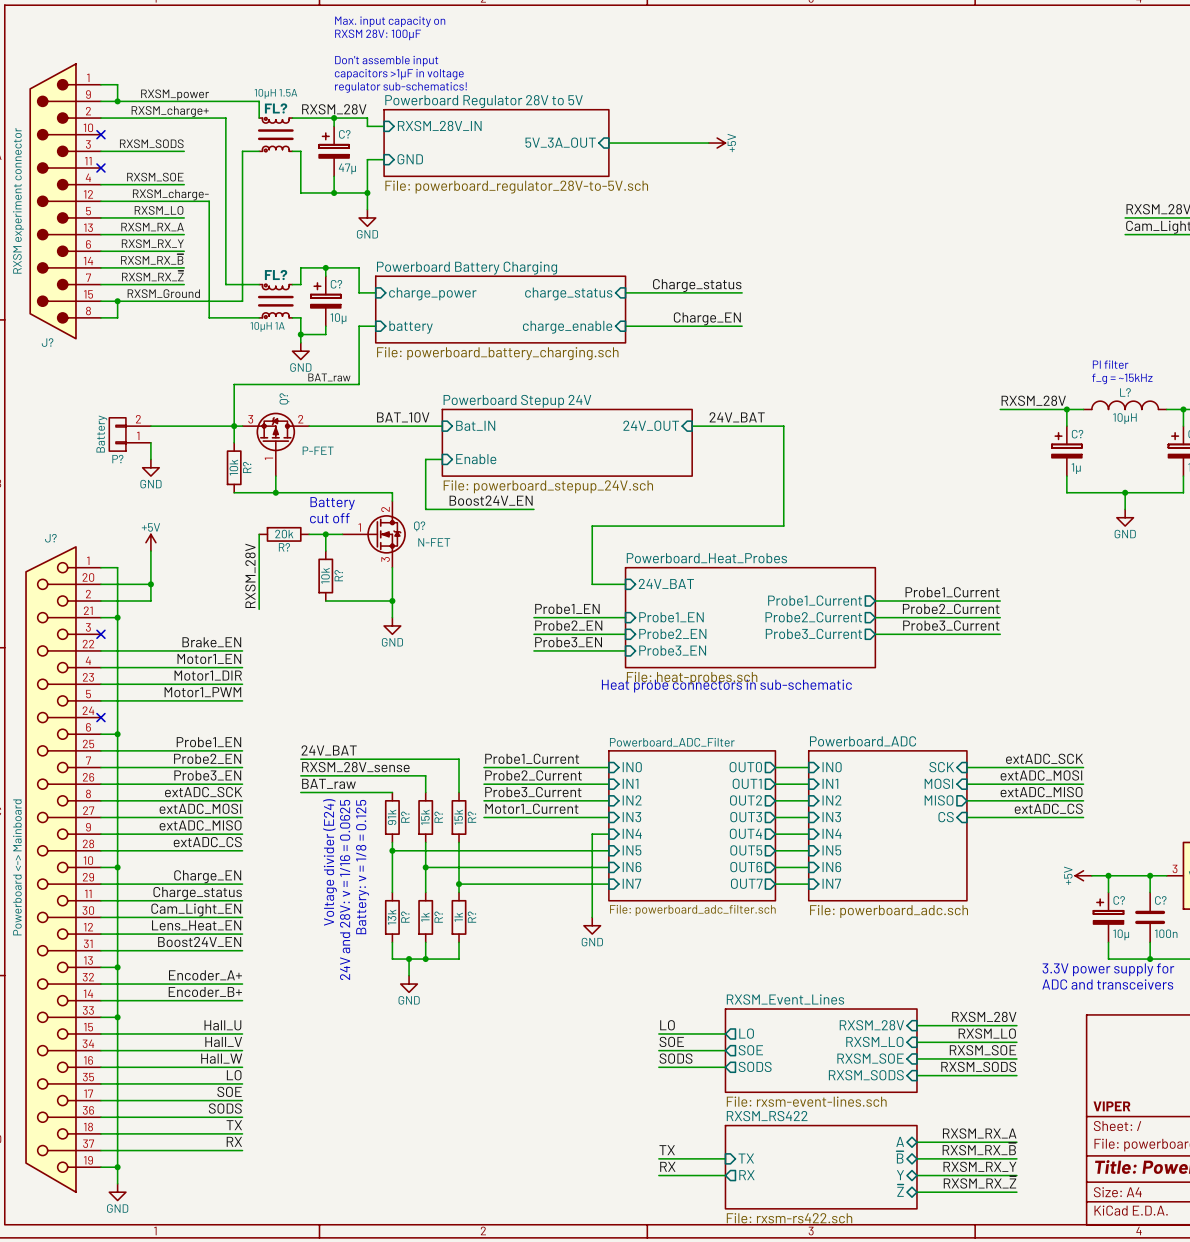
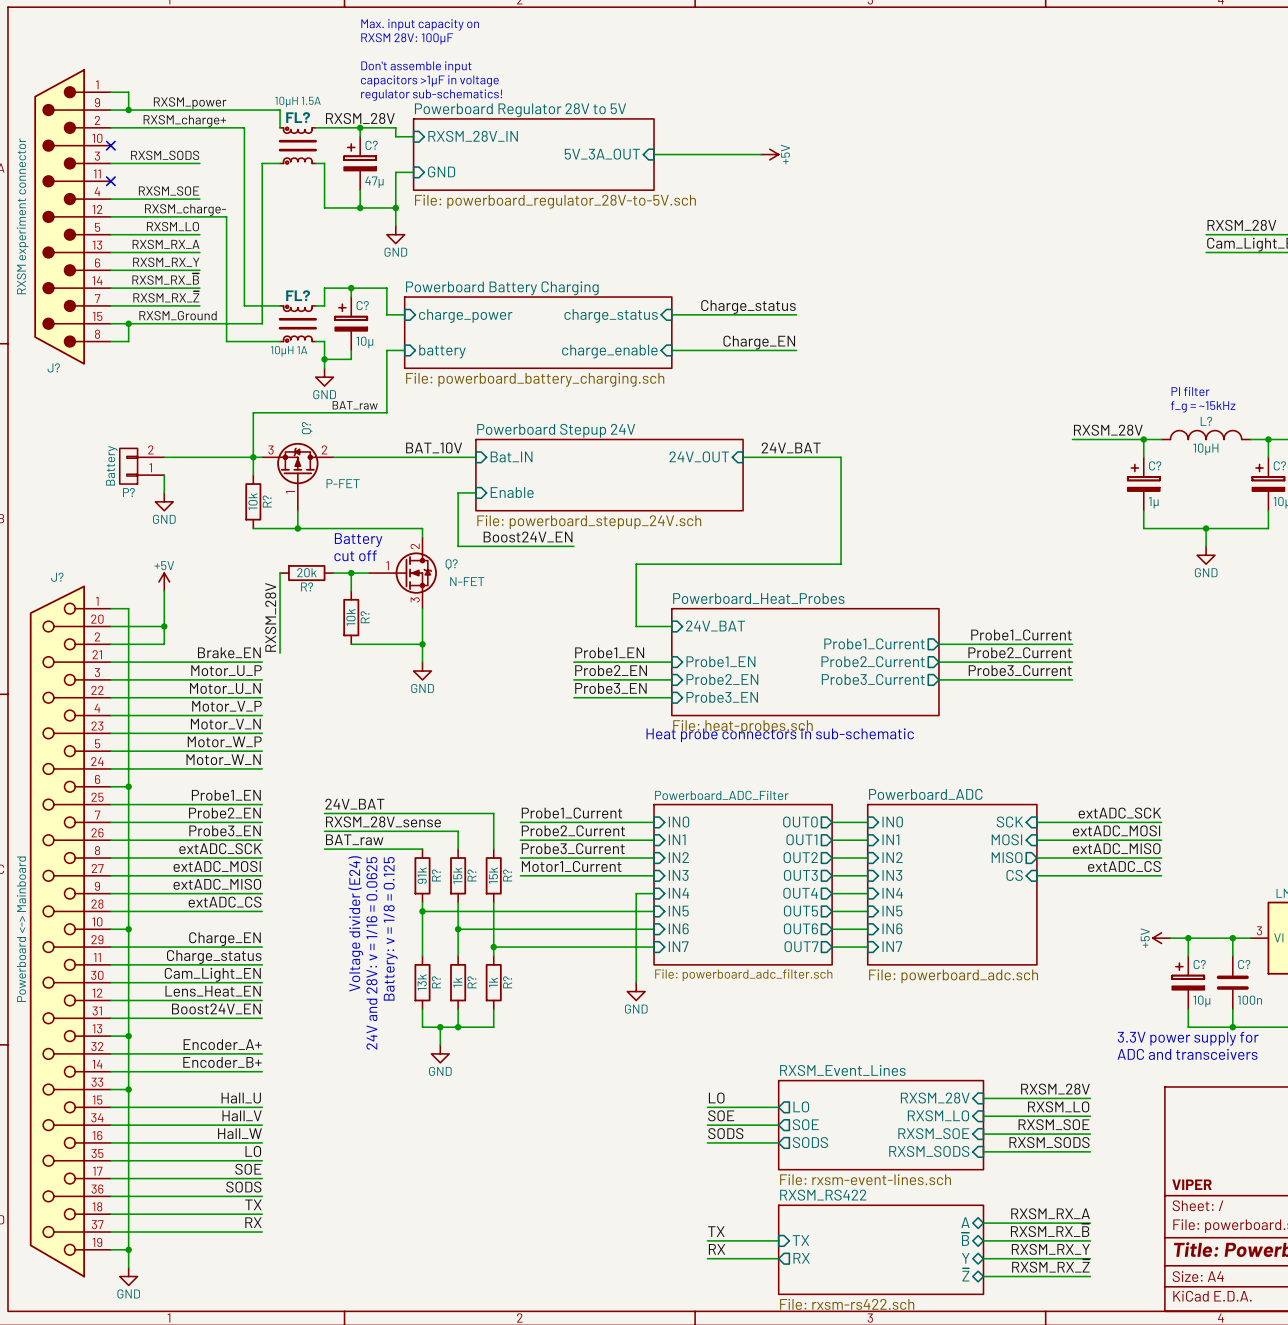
label: none -> Brake_EN (229, 652)
wire: none -> (128, 662) (262, 662)
junction: (117, 617) -> none
label: none -> Motor_U_P (226, 670)
wire: none -> (110, 679) (262, 679)
no-connect mark: (100, 634) -> none
label: Brake_EN (211, 642) -> Motor_U_N (225, 688)
label: Motor1_EN (209, 658) -> Motor_V_P (226, 706)
label: Motor1_DIR (208, 675) -> Motor_V_N (225, 724)
label: Motor1_PWM (202, 692) -> Motor_W_P (224, 741)
label: none -> Motor_W_N (223, 759)
wire: none -> (110, 768) (262, 768)
no-connect mark: (100, 717) -> none

